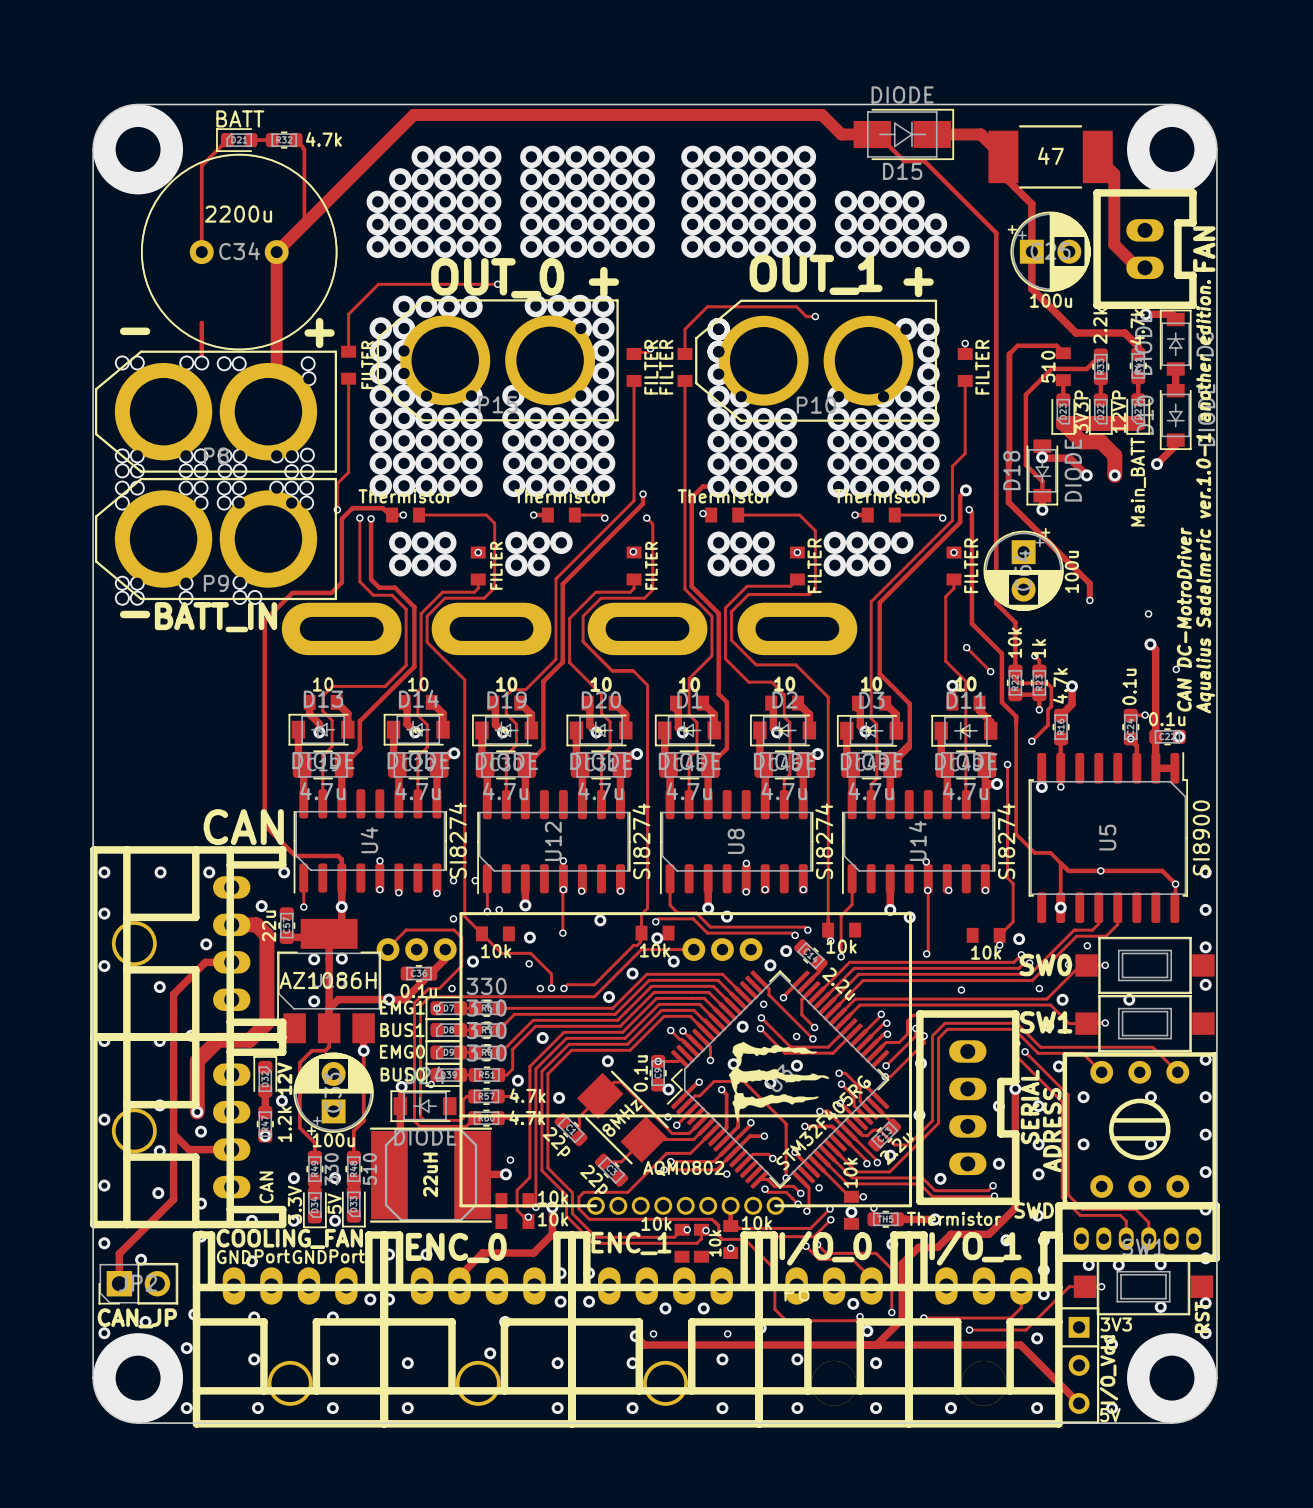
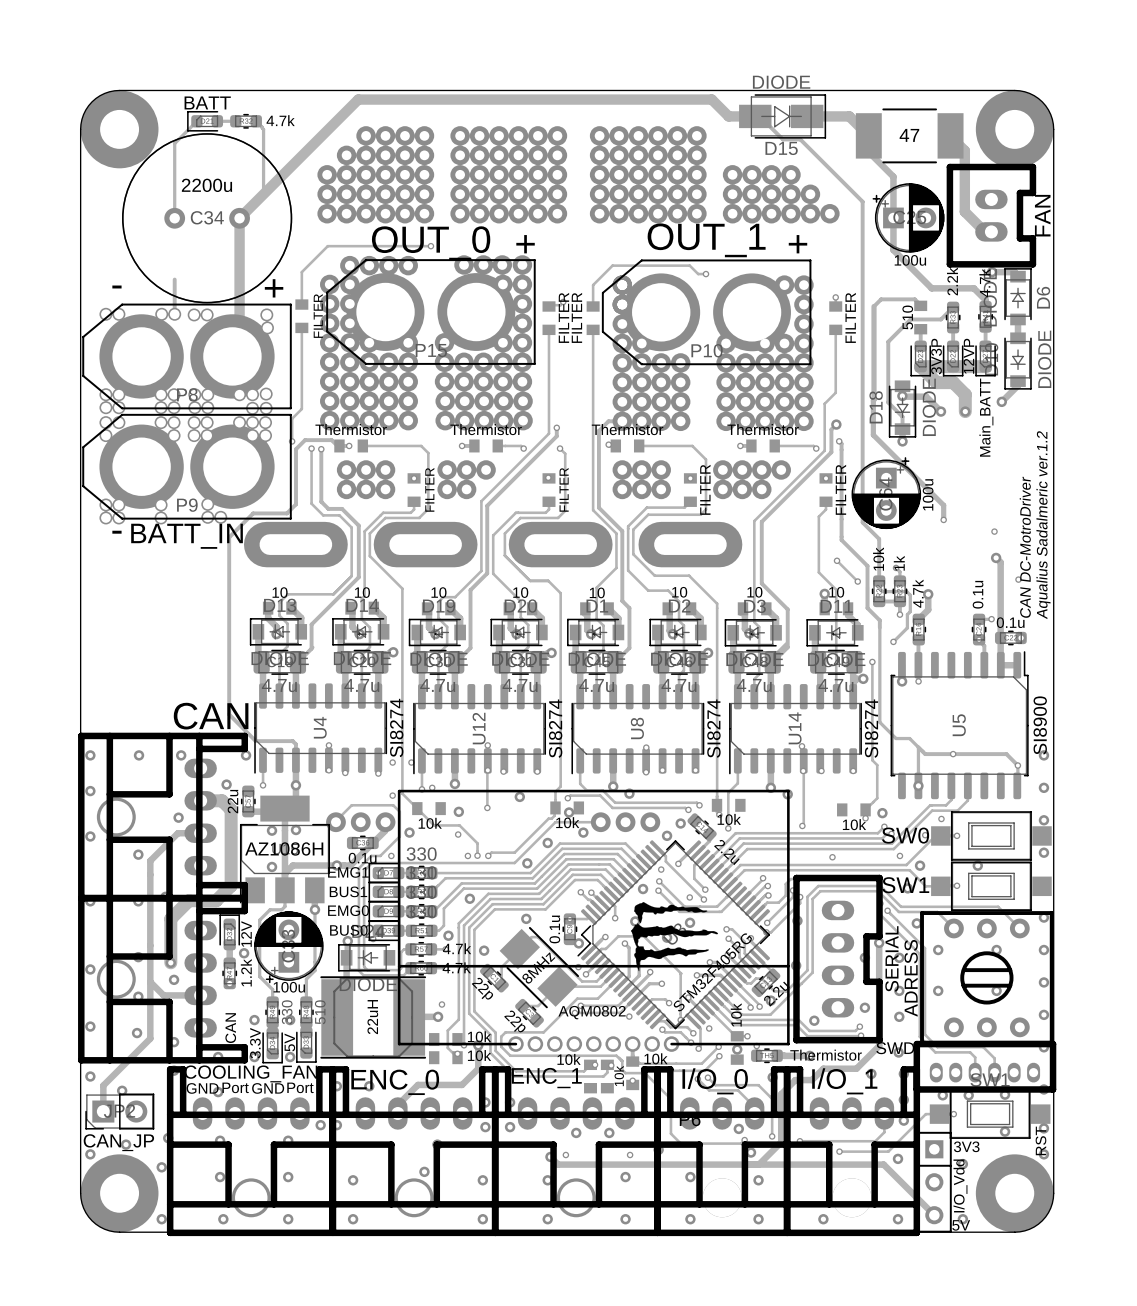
text: Aqualius Sadalmeric ver.1.0-1 another edition. (1205, 496) -> Aqualius Sadalmeric ver.1.2 (1043, 525)

